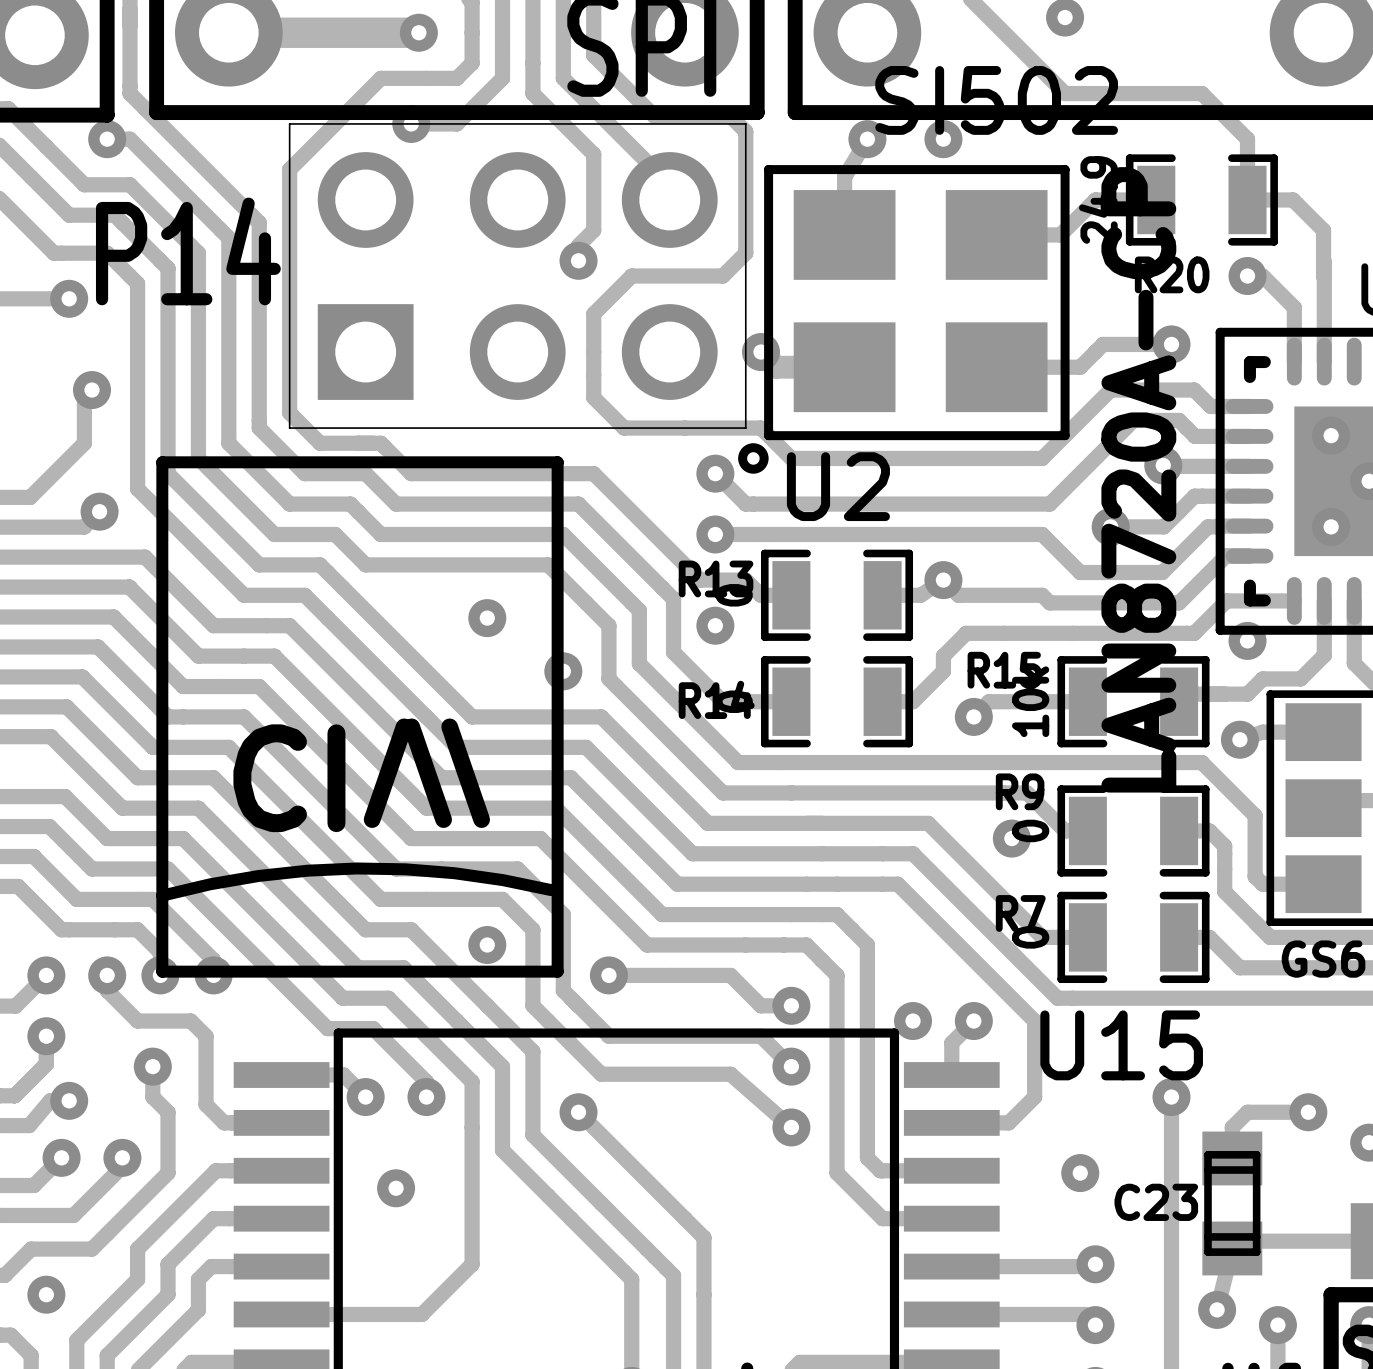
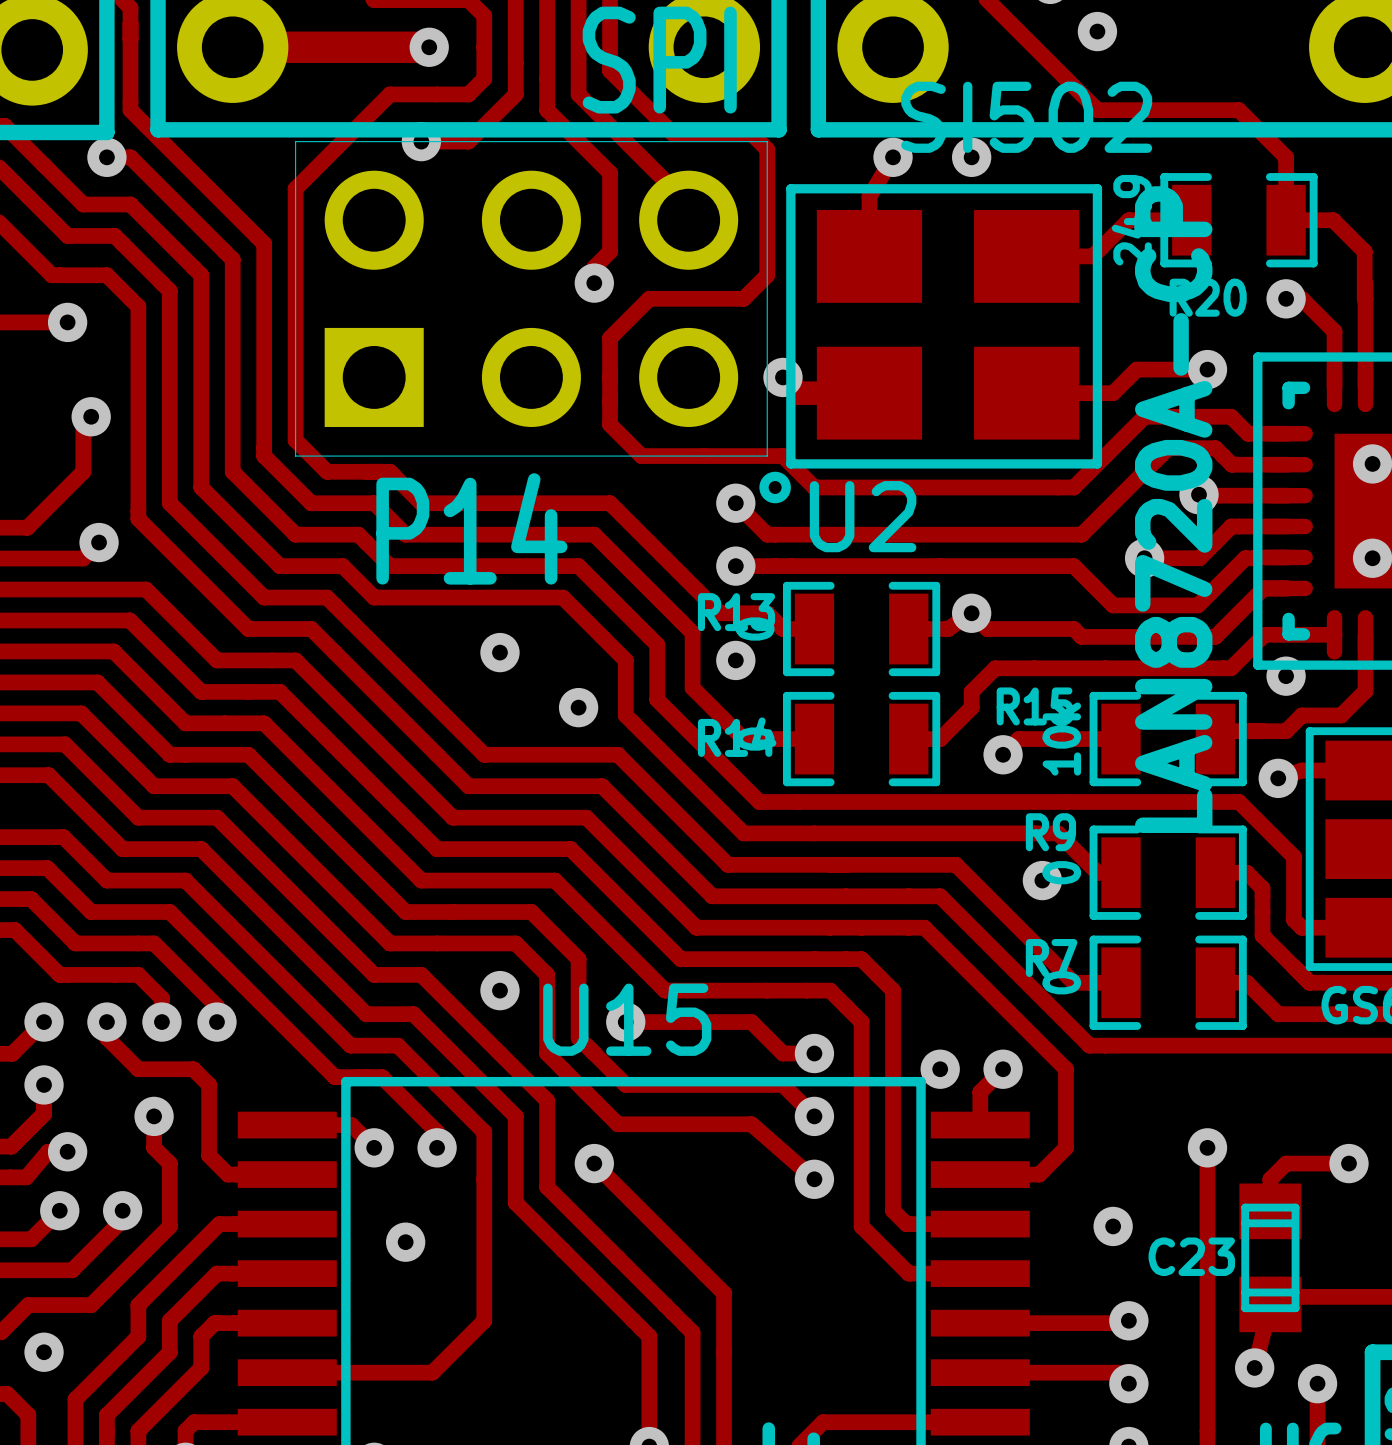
P14 name position: P14 (188, 251) -> P14 (471, 528)
line: (162, 462) (557, 462) (557, 971) (162, 971) (162, 462) -> none
line: (404, 726) (372, 819) -> none
line: (411, 726) (443, 819) -> none
line: (449, 726) (481, 819) -> none
text: CI (289, 778) -> none
line: (551, 890) (503, 880) (454, 873) (405, 869) (356, 868) (307, 870) (258, 875) (210, 884) (162, 895) -> none
U15 name position: U15 (1121, 1045) -> U15 (627, 1019)

